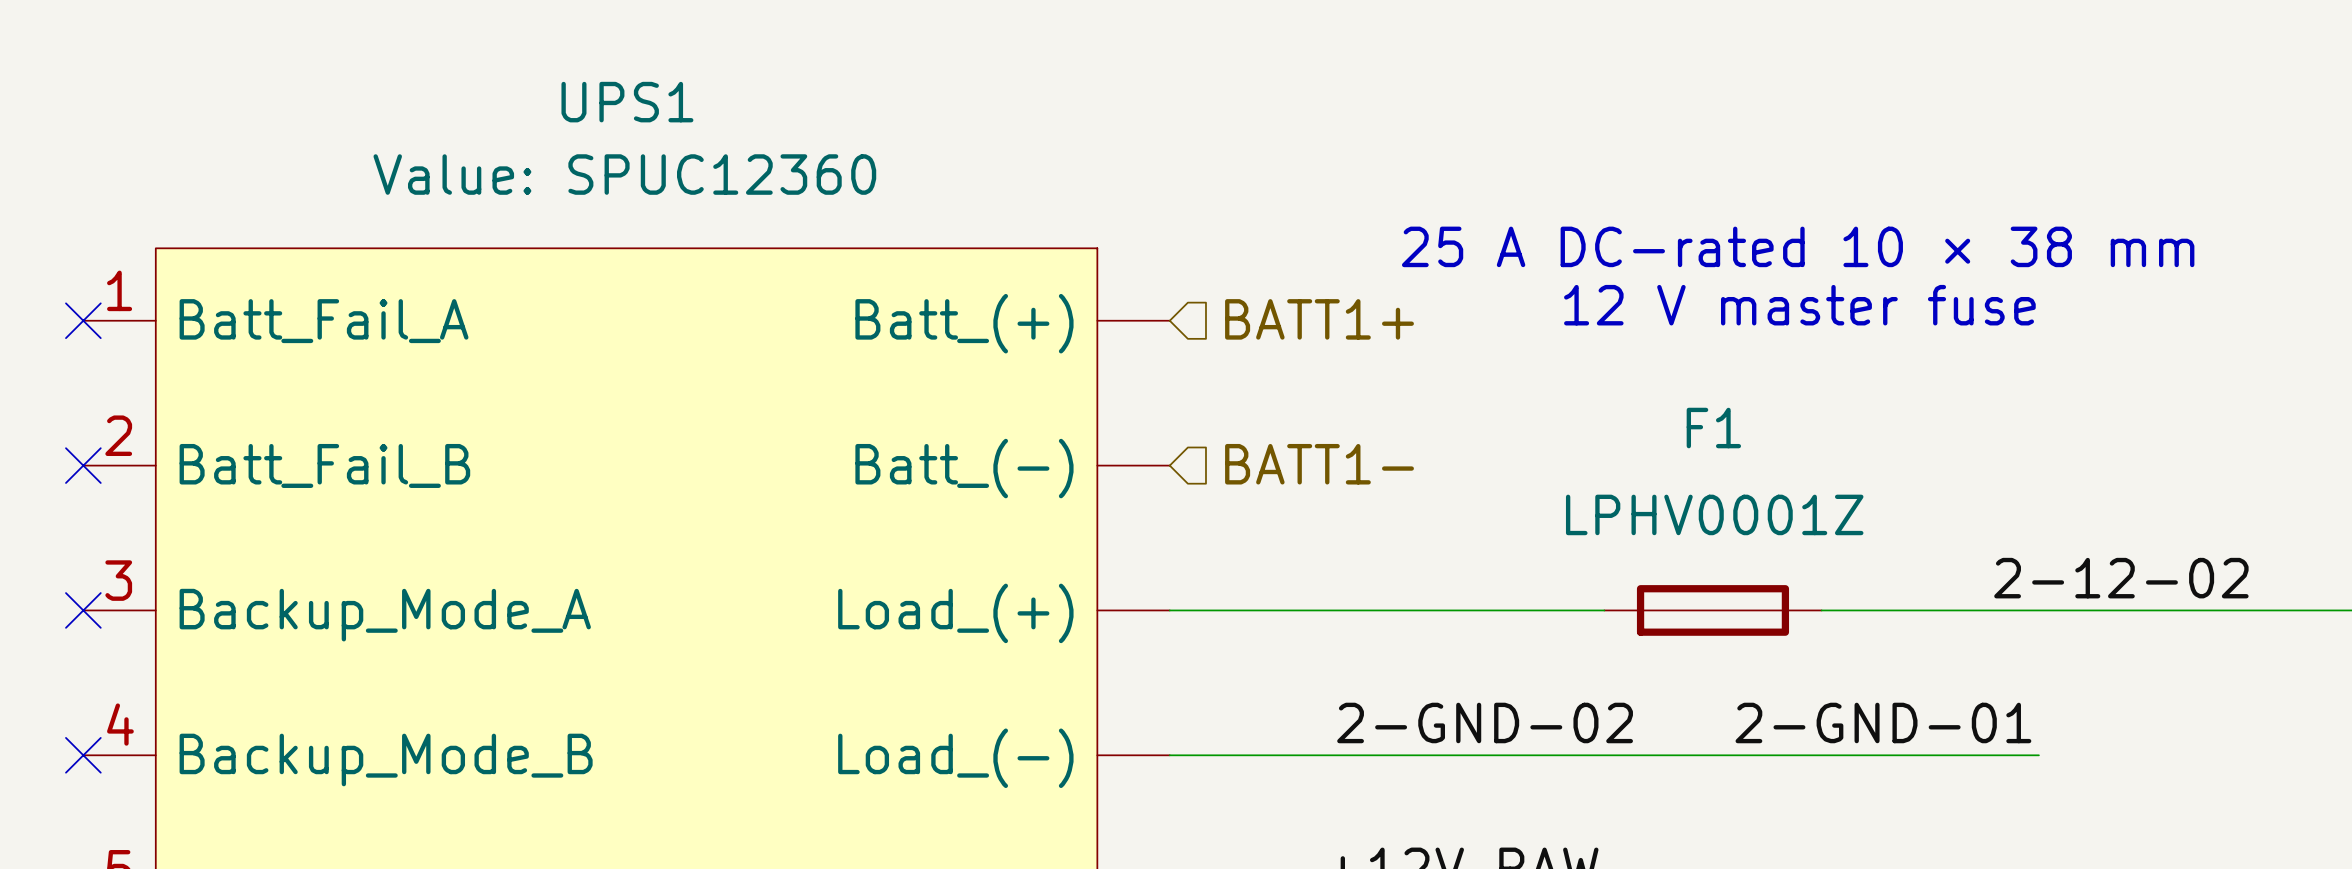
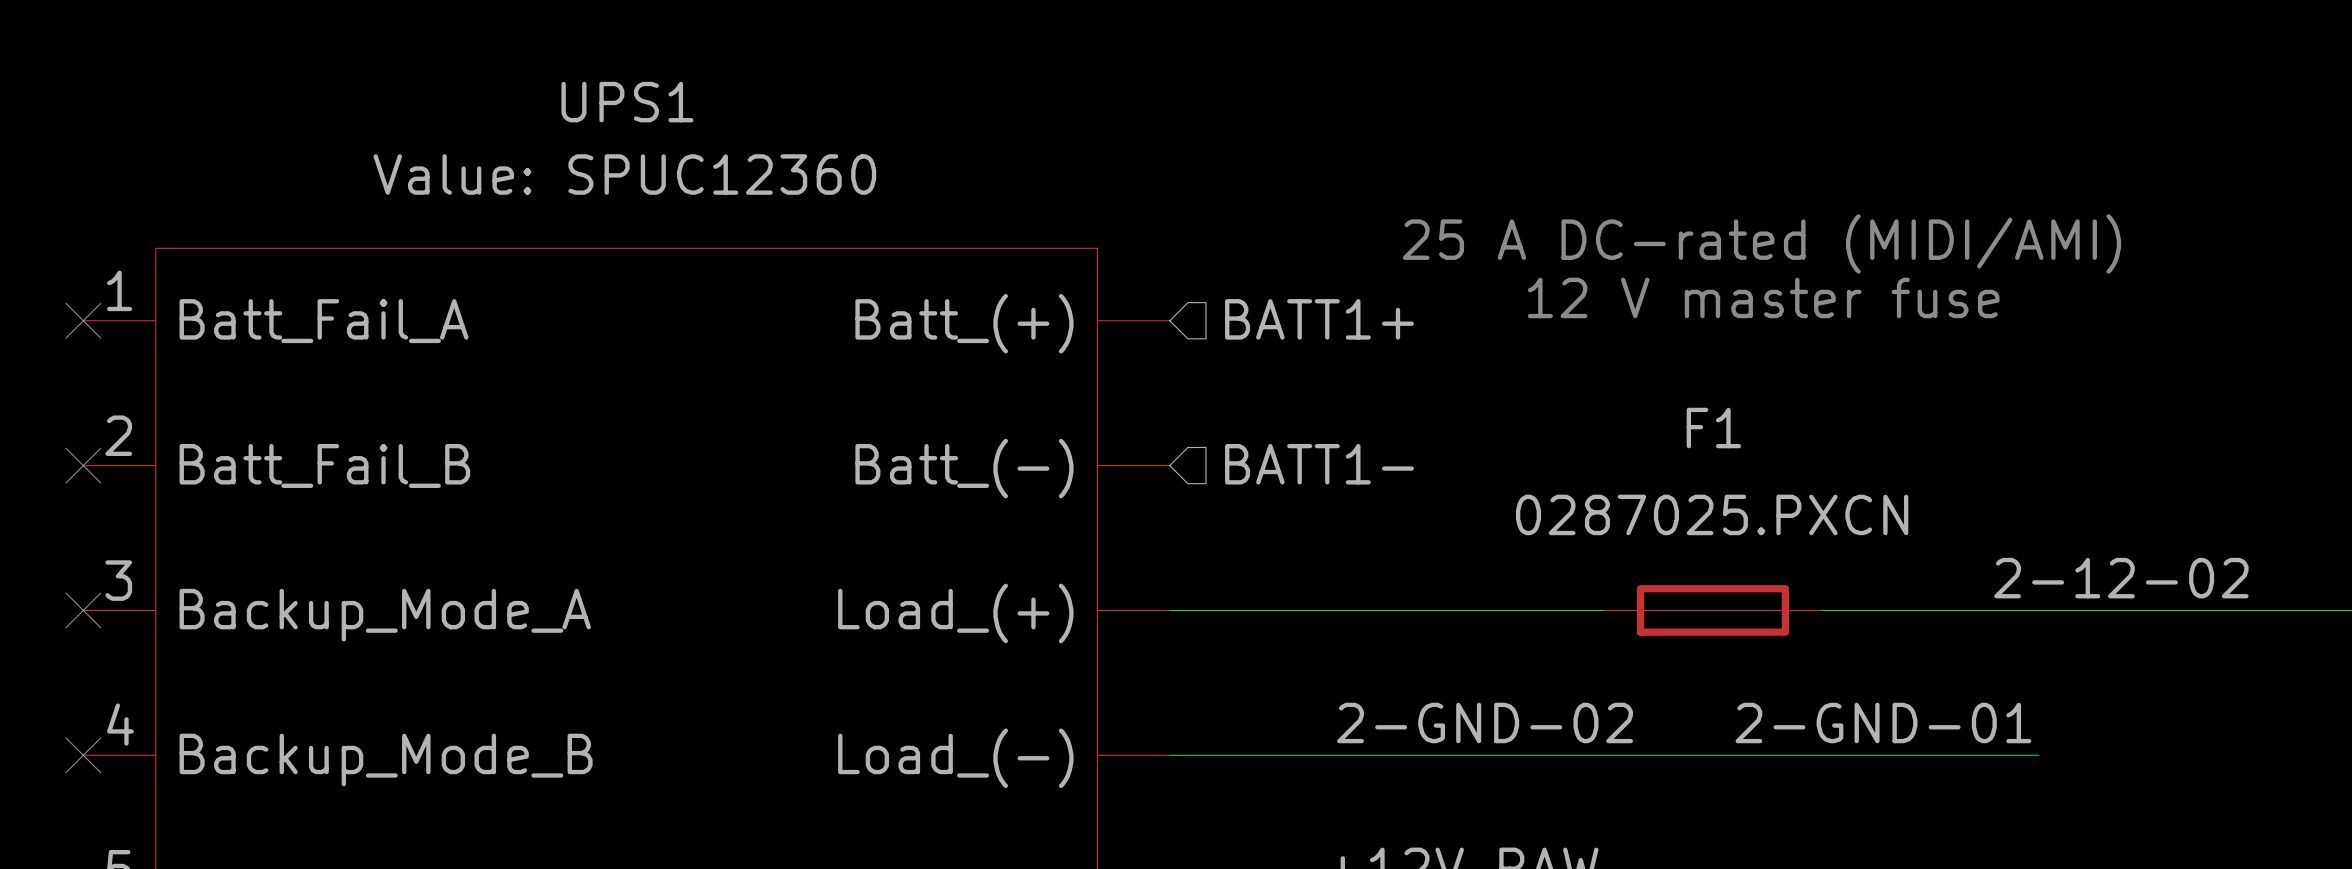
text: none -> 25 A DC-rated (MIDI/AMI) (1761, 243)
text: 25 A DC-rated 10 × 38 mm (1798, 246) -> none
text position: 12 V master fuse (1799, 305) -> 12 V master fuse (1763, 297)
F1 value: LPHV0001Z (1714, 514) -> 0287025.PXCN (1712, 514)

